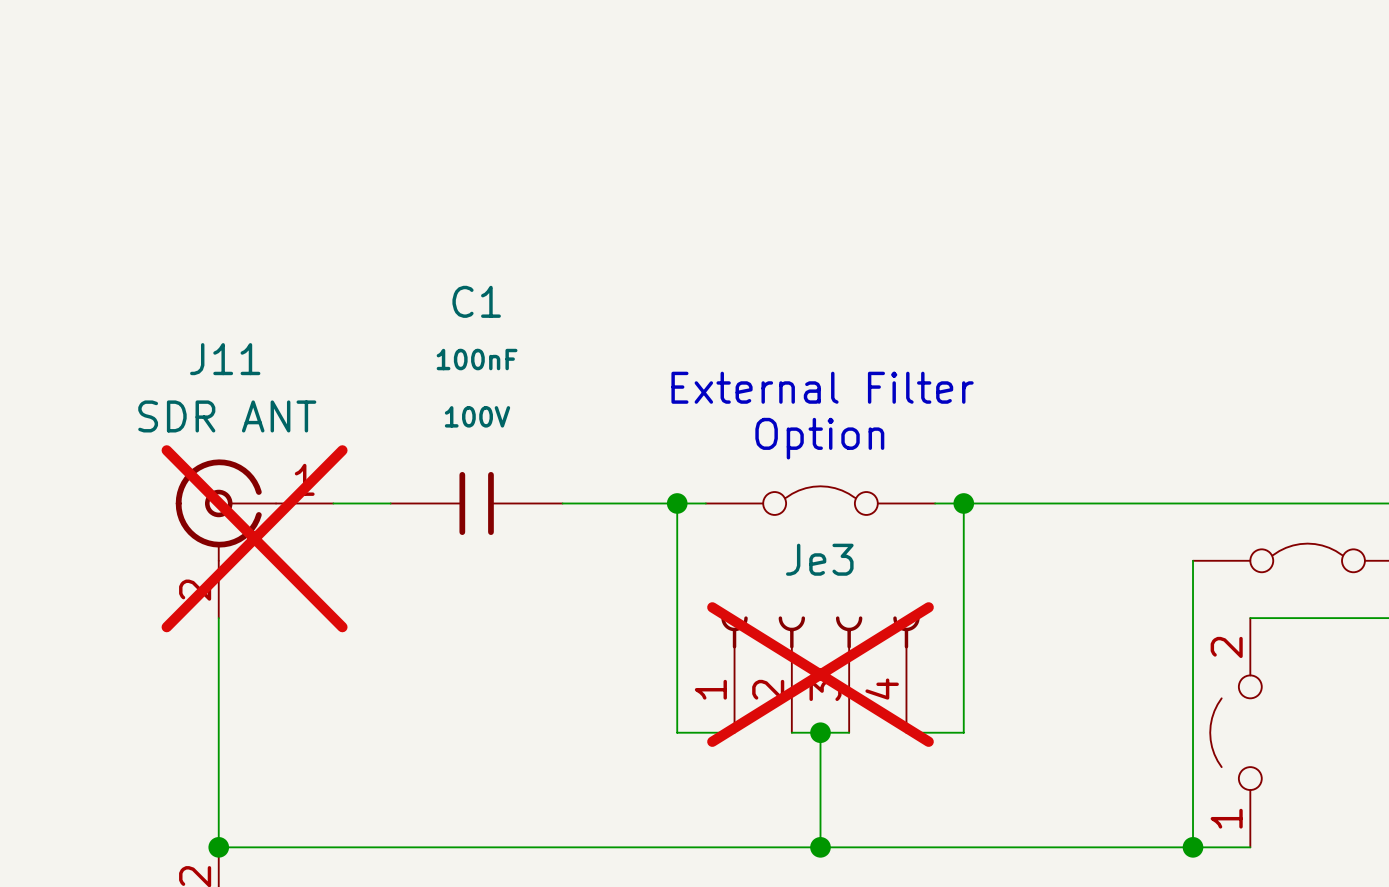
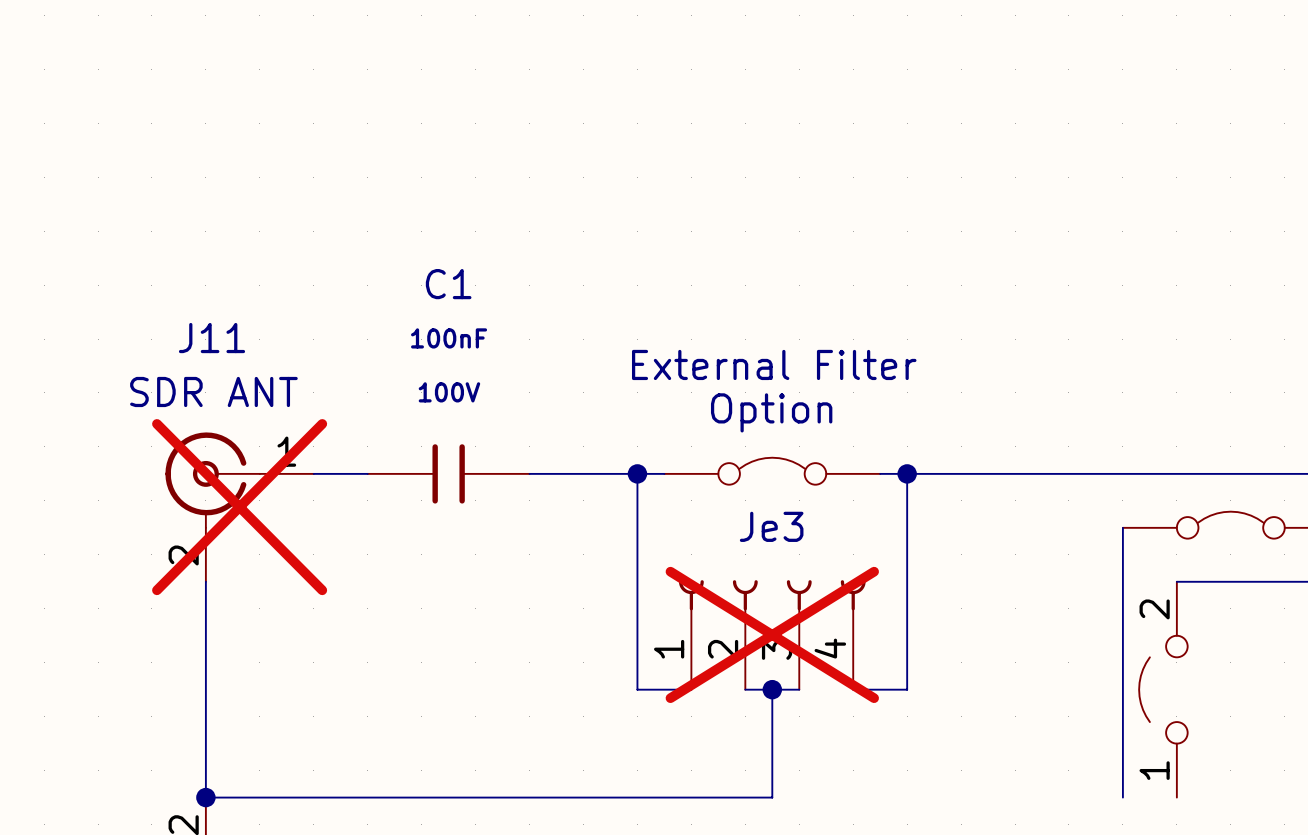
wire: (820, 847) (1250, 847) -> none
junction: (820, 847) -> none
junction: (1193, 847) -> none

